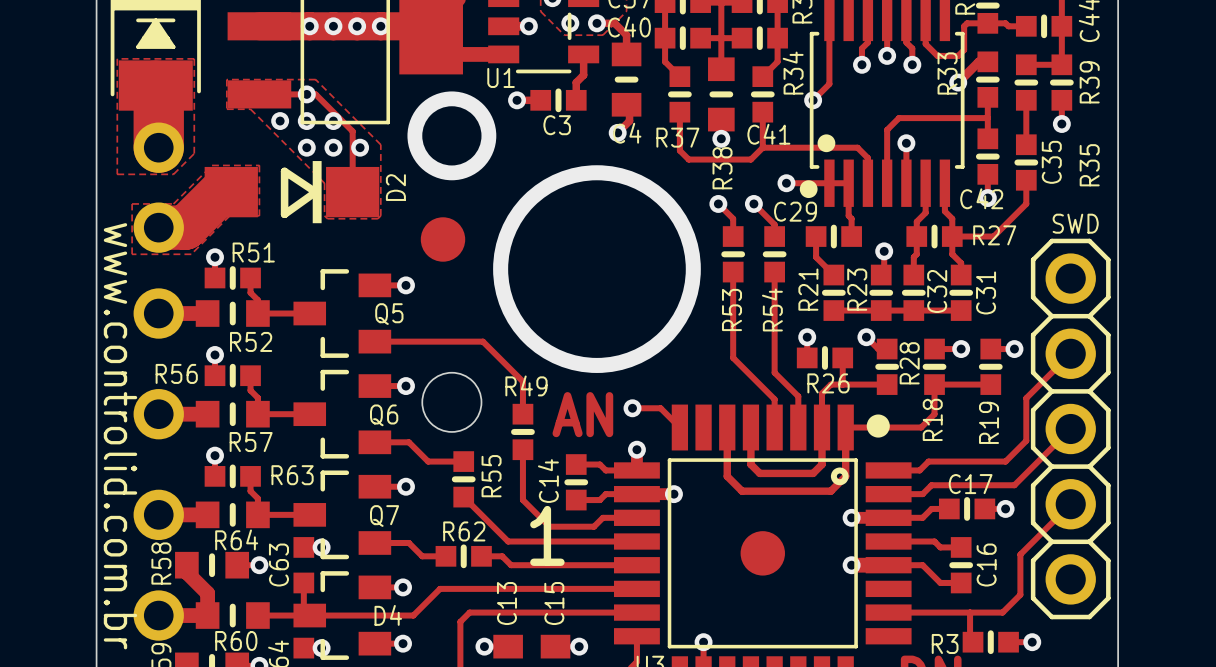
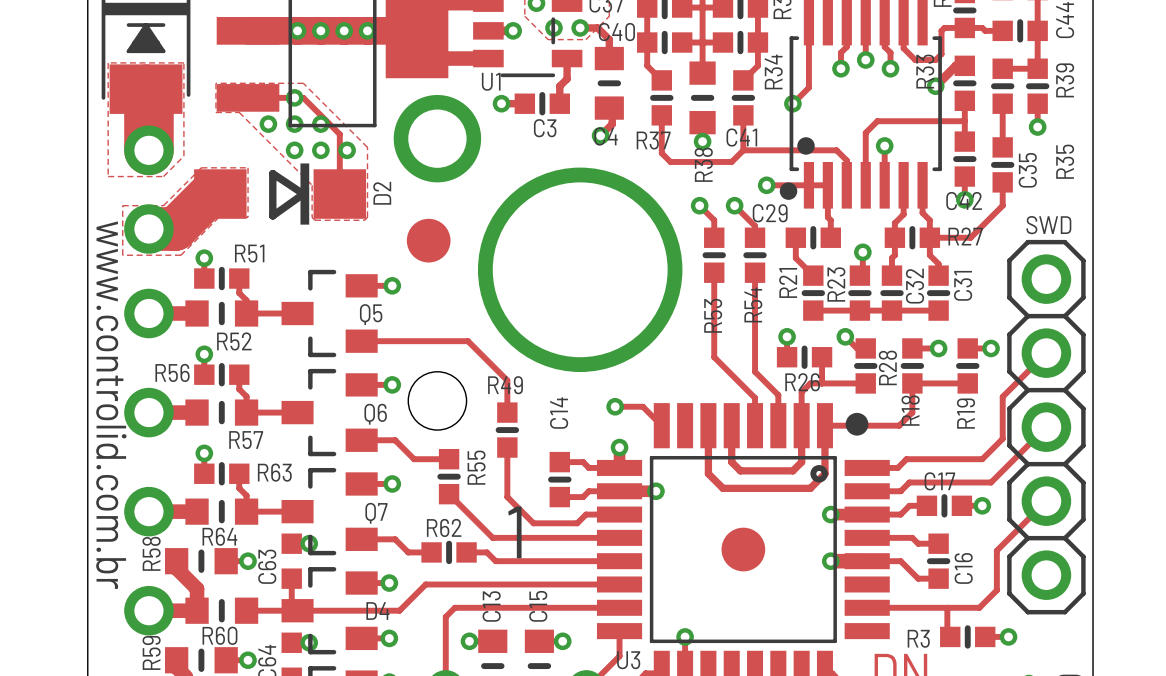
text: AN (582, 414) -> none
C14 name position: C14 (548, 481) -> C14 (559, 413)

